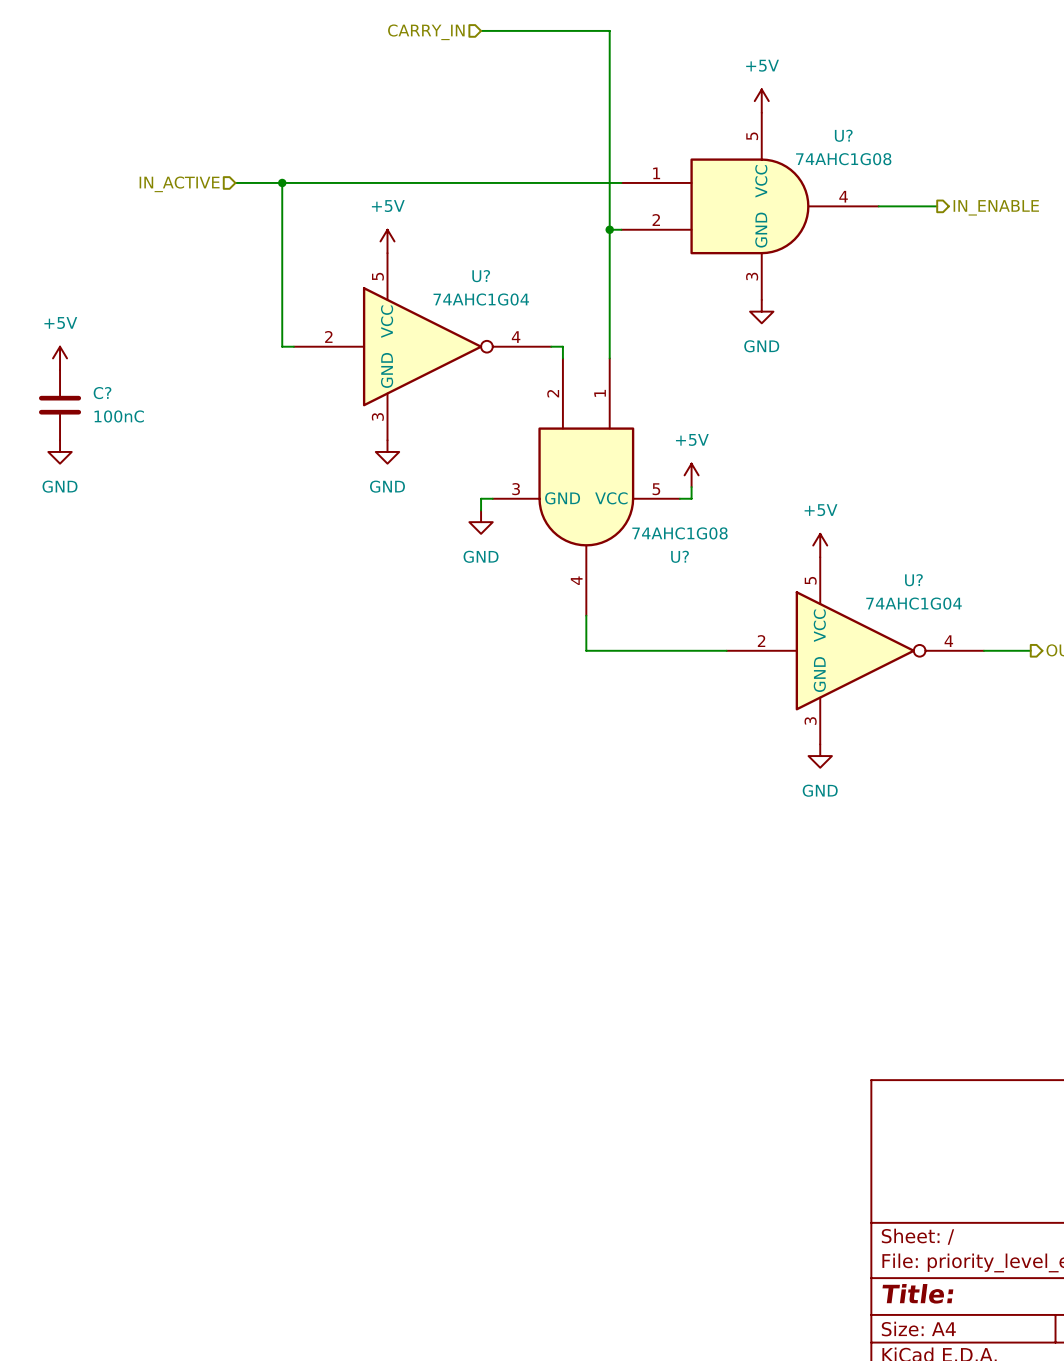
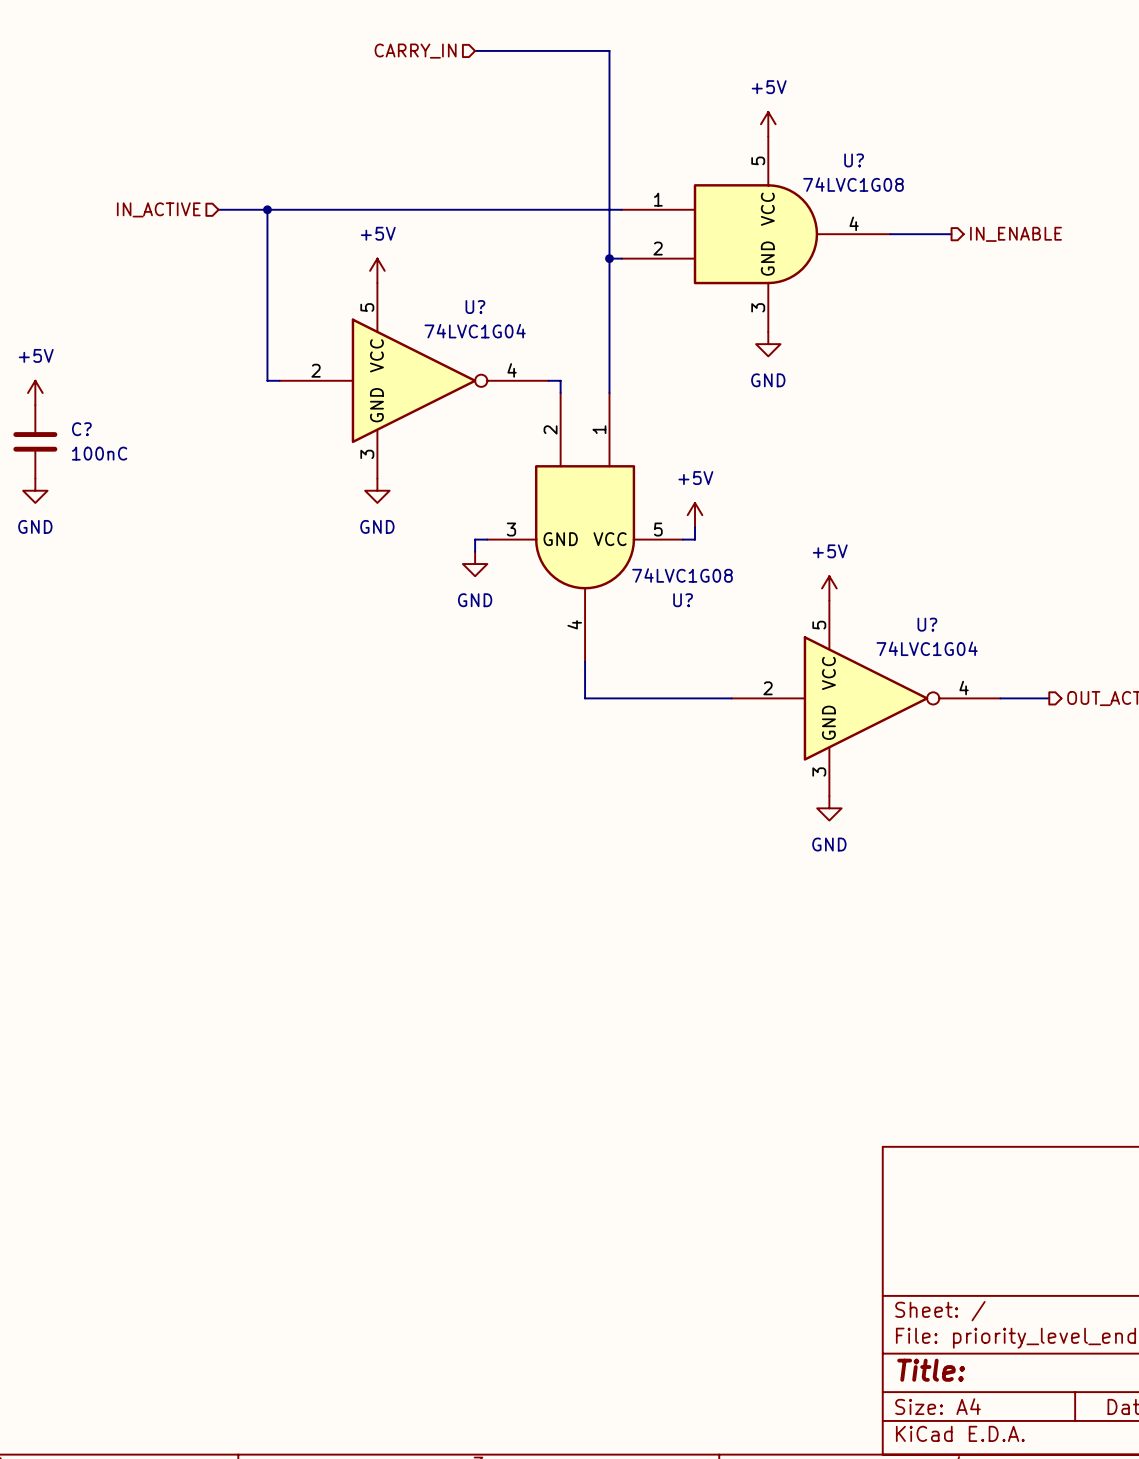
U? value: 74AHC1G08 (843, 159) -> 74LVC1G08 (853, 184)
U? value: 74AHC1G04 (481, 299) -> 74LVC1G04 (475, 331)
U? value: 74AHC1G08 (679, 533) -> 74LVC1G08 (682, 575)
U? value: 74AHC1G04 (914, 603) -> 74LVC1G04 (927, 648)

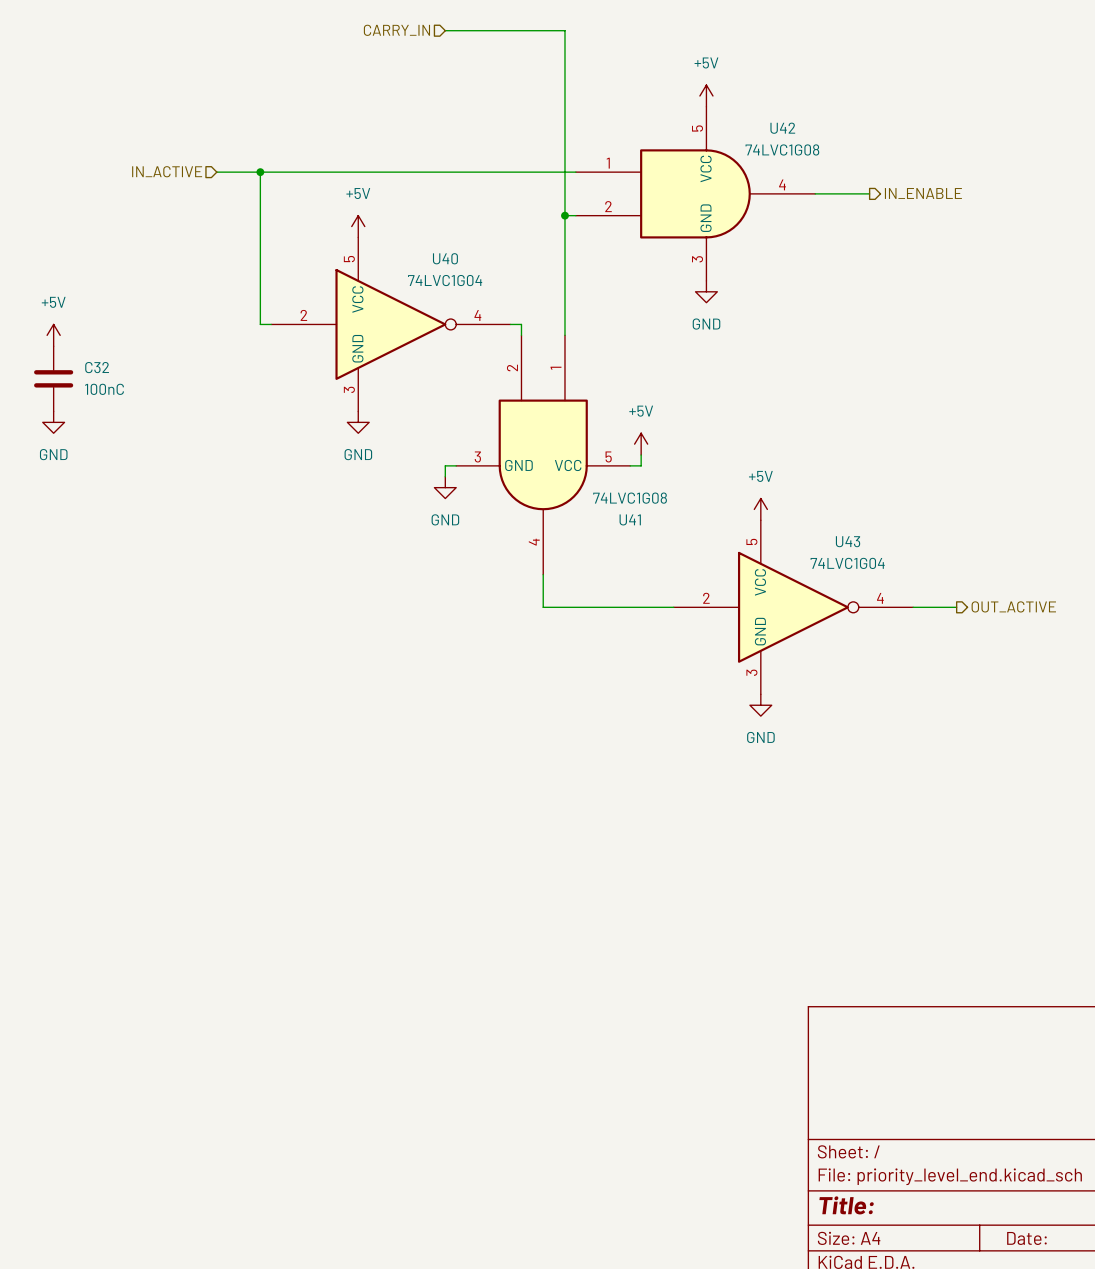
U? name: U? (854, 160) -> U42 (782, 128)
U? name: U? (475, 307) -> U40 (445, 258)
C? name: C? (81, 429) -> C32 (97, 367)
U? name: U? (683, 600) -> U41 (630, 519)
U? name: U? (927, 624) -> U43 (848, 541)

